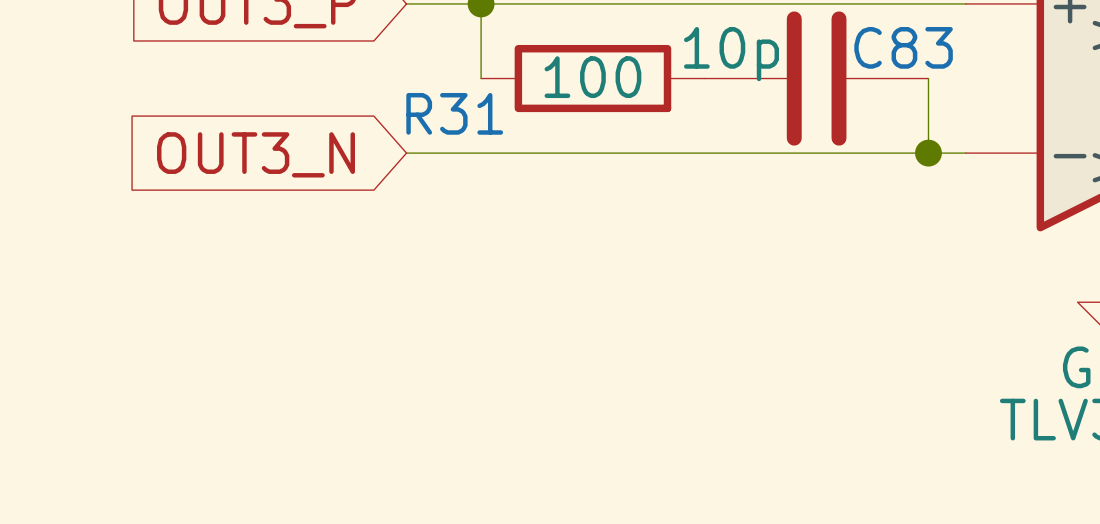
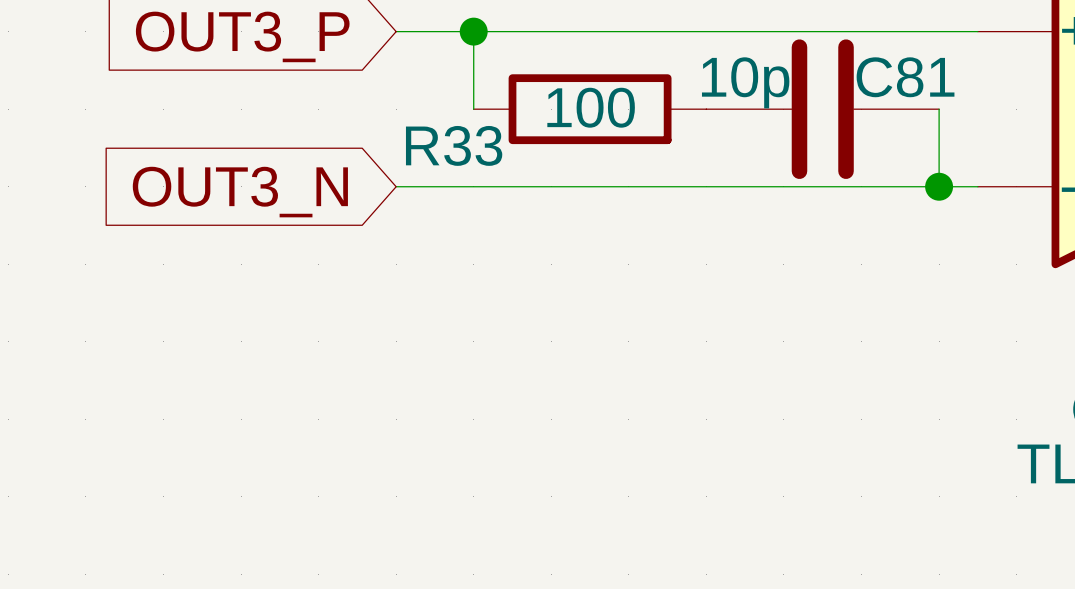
C83 name: C83 (903, 47) -> C81 (905, 77)
R31 name: R31 (454, 113) -> R33 (454, 145)

